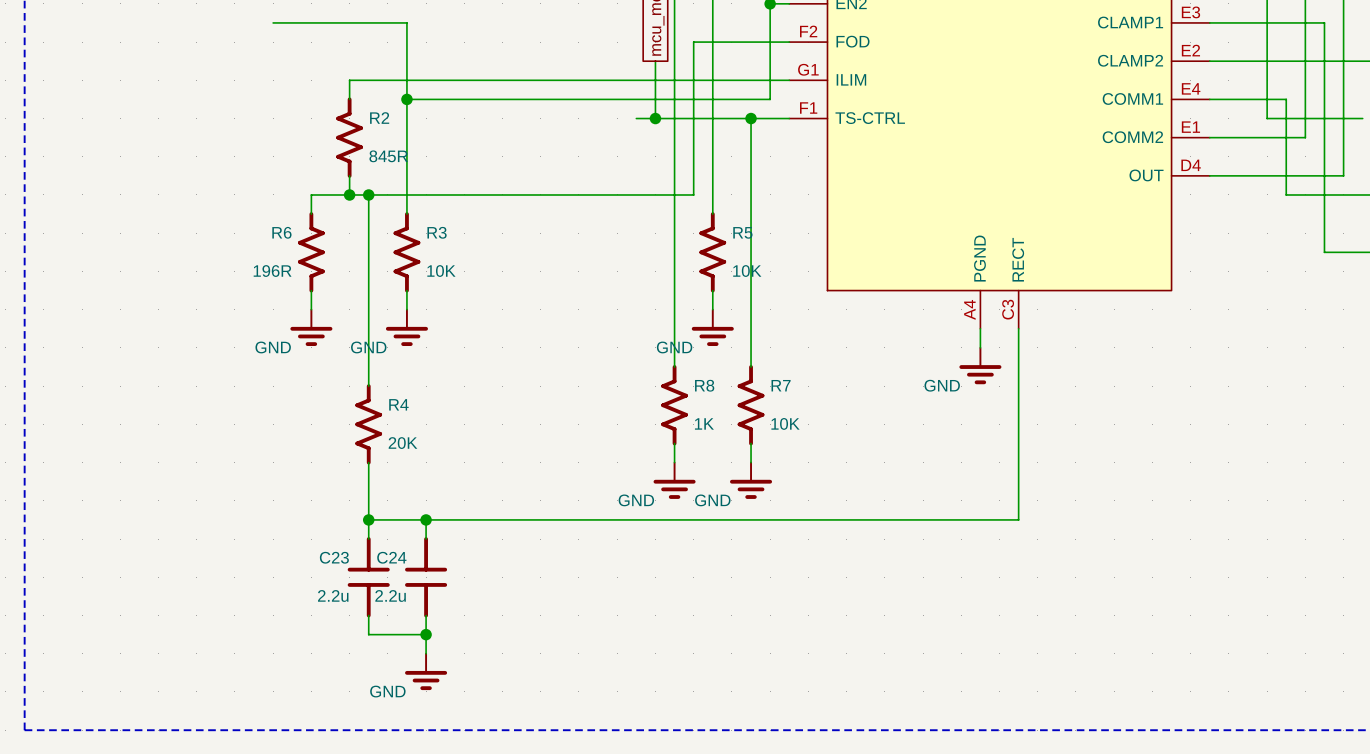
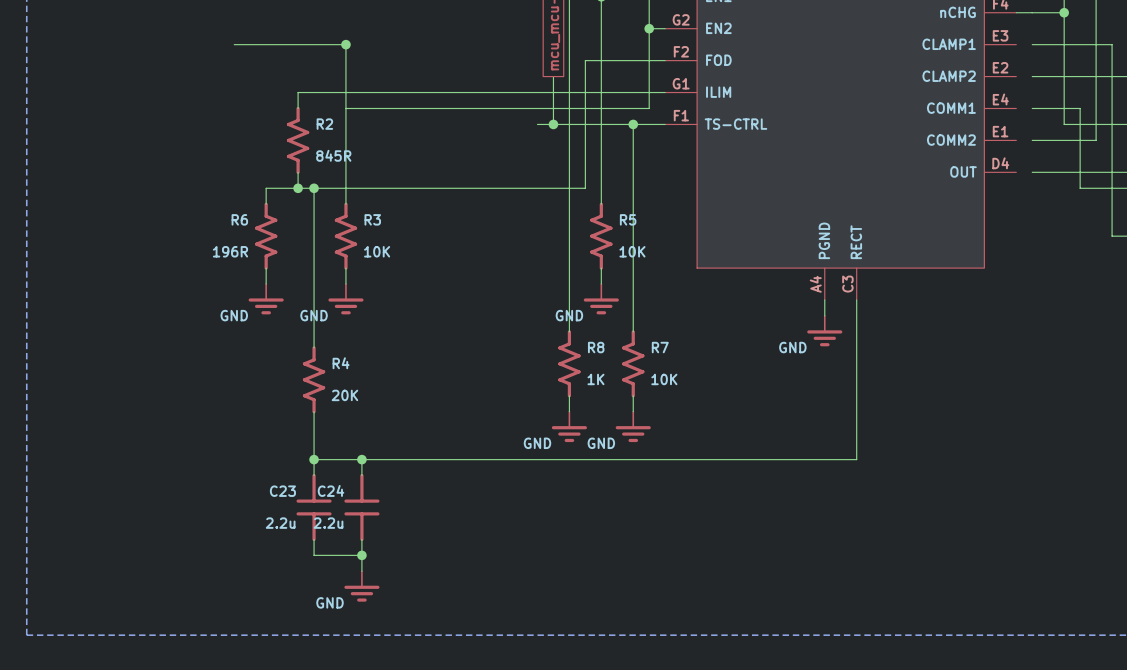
wire: (1209, 22) (1228, 22) -> none
wire: (1209, 61) (1228, 61) -> none
junction position: (406, 99) -> (345, 44)
wire: (1209, 99) (1228, 99) -> none
wire: (1209, 137) (1228, 137) -> none
wire: (1209, 175) (1228, 175) -> none

